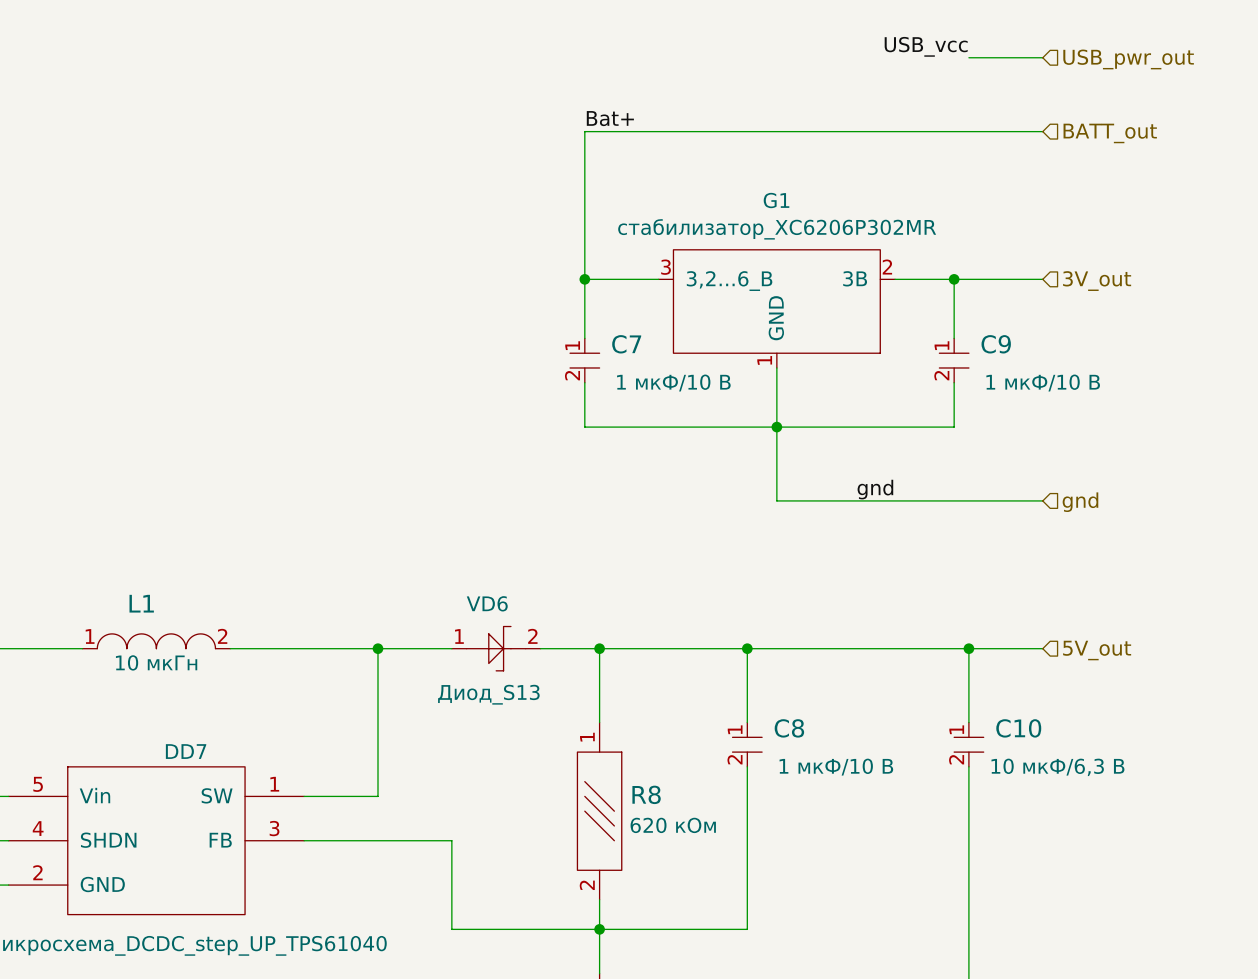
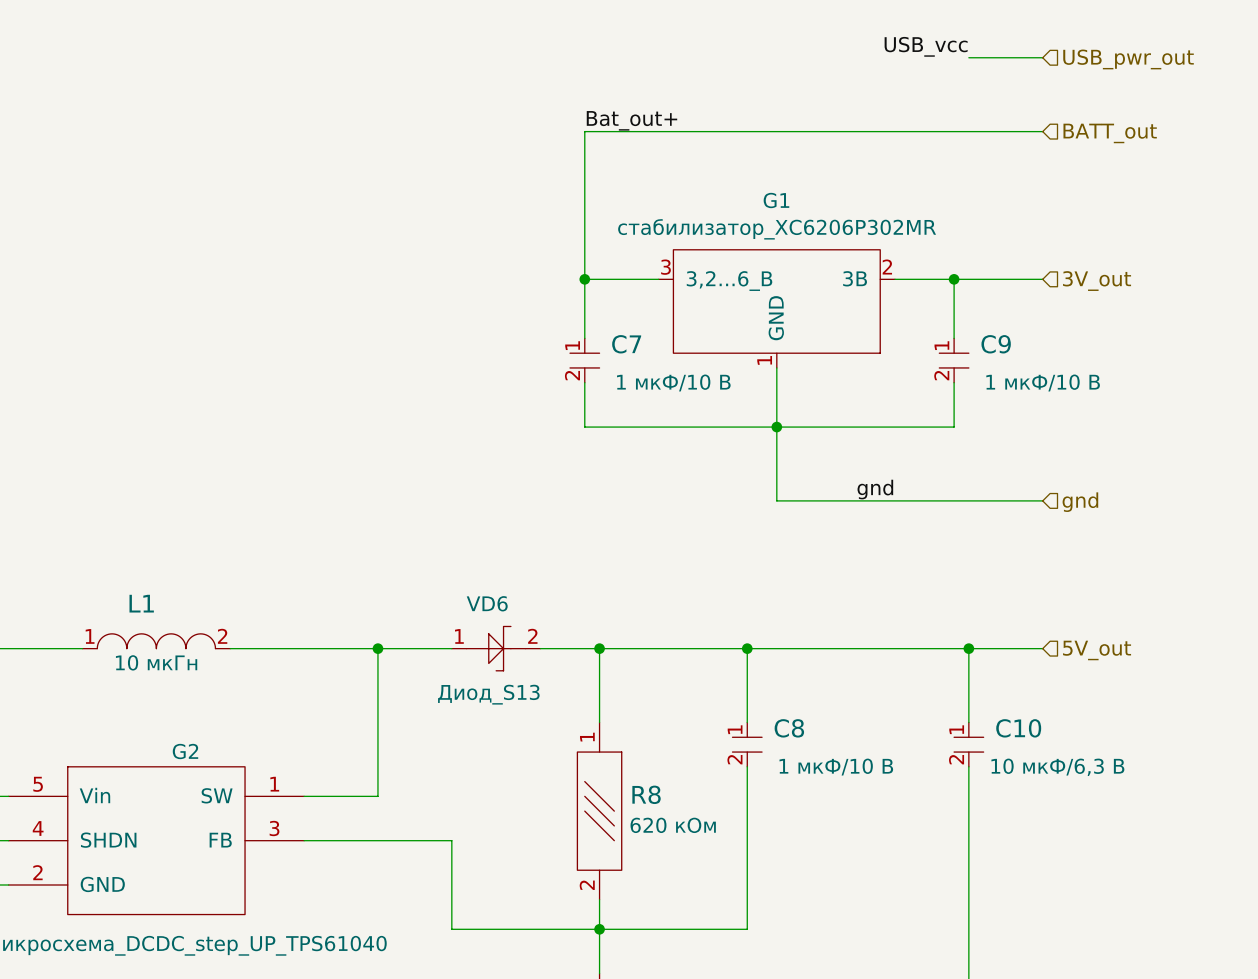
label: Bat+ (610, 118) -> Bat_out+ (631, 120)
DD7 name: DD7 (186, 751) -> G2 (185, 751)

